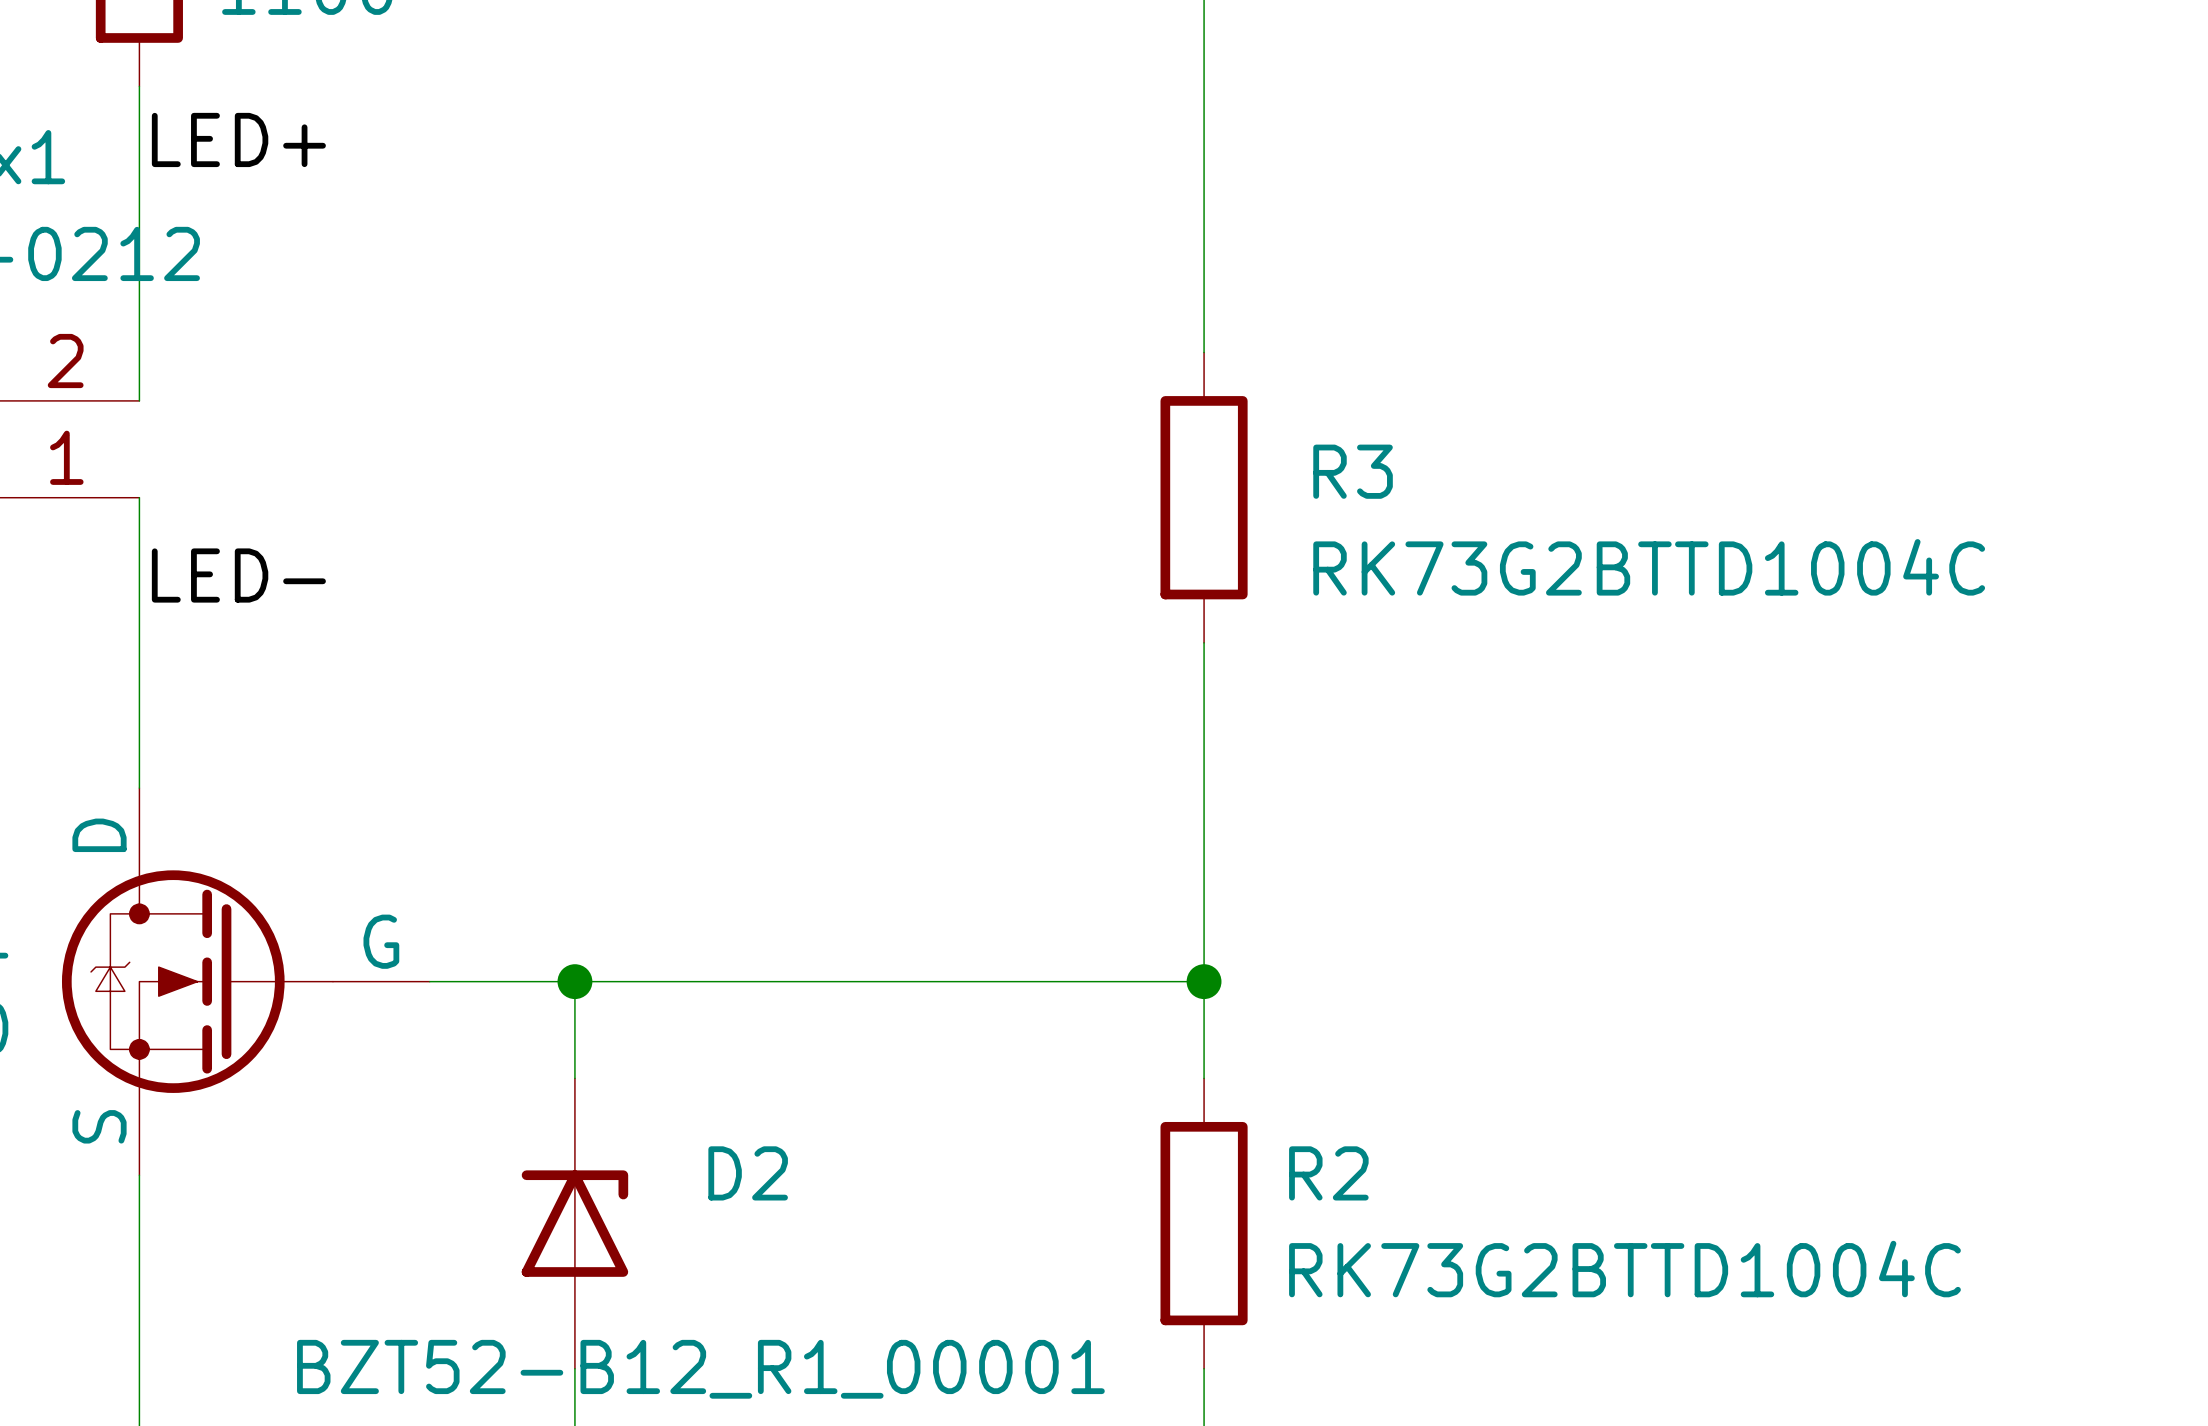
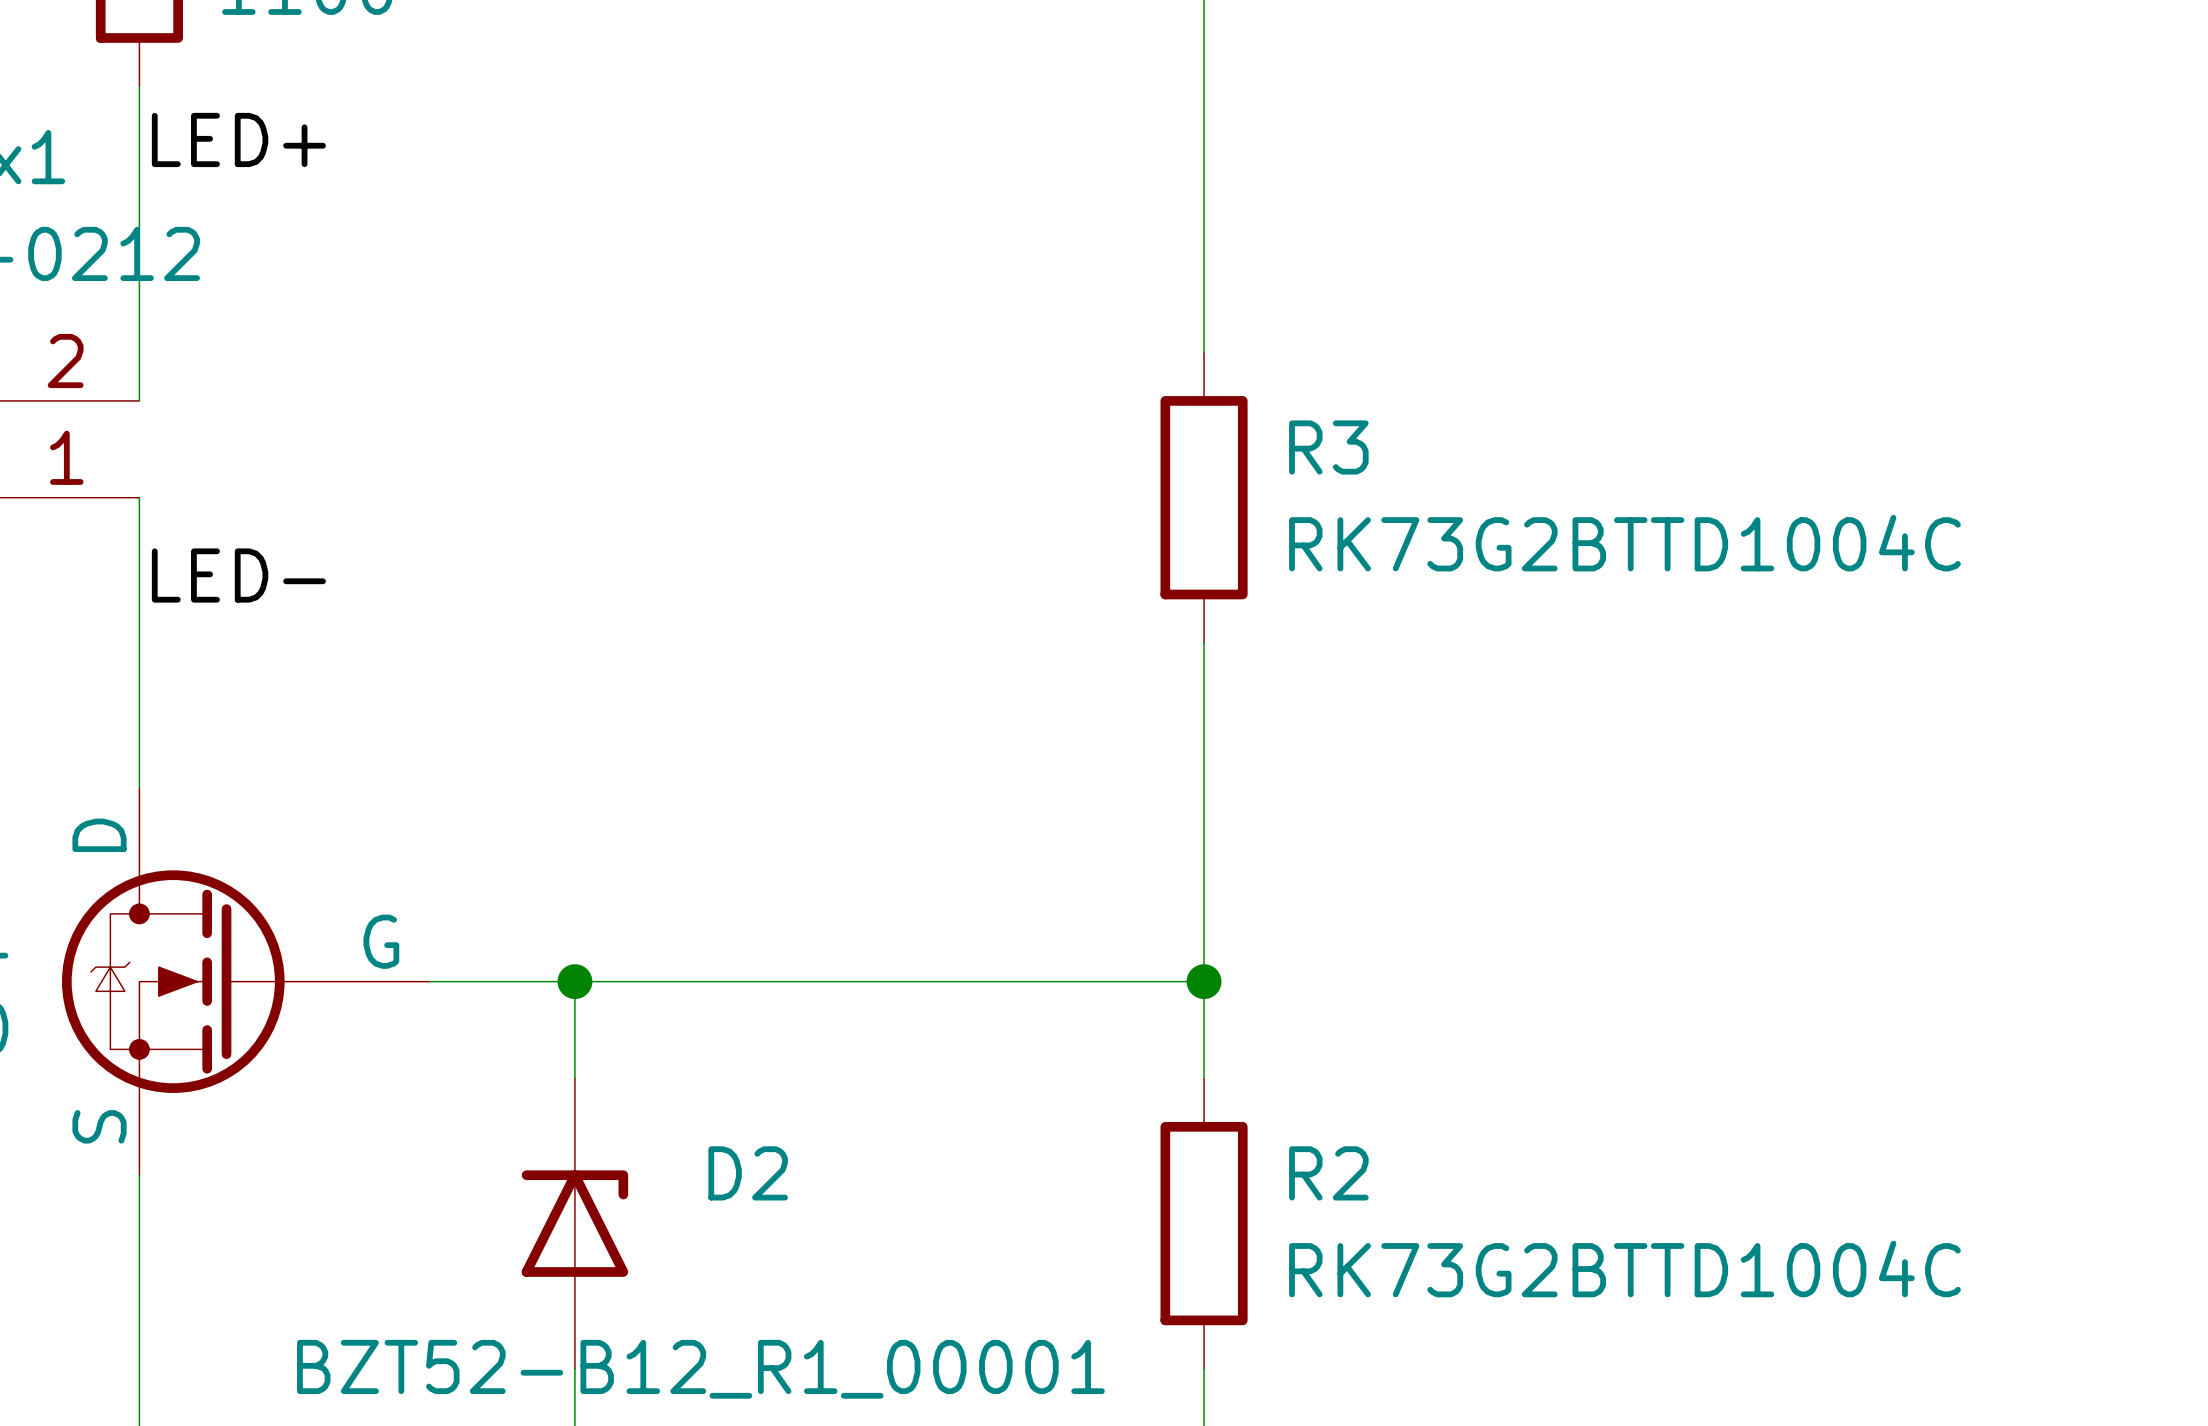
R3 name position: R3 (1353, 471) -> R3 (1328, 447)
R3 value position: RK73G2BTTD1004C (1649, 567) -> RK73G2BTTD1004C (1624, 543)

